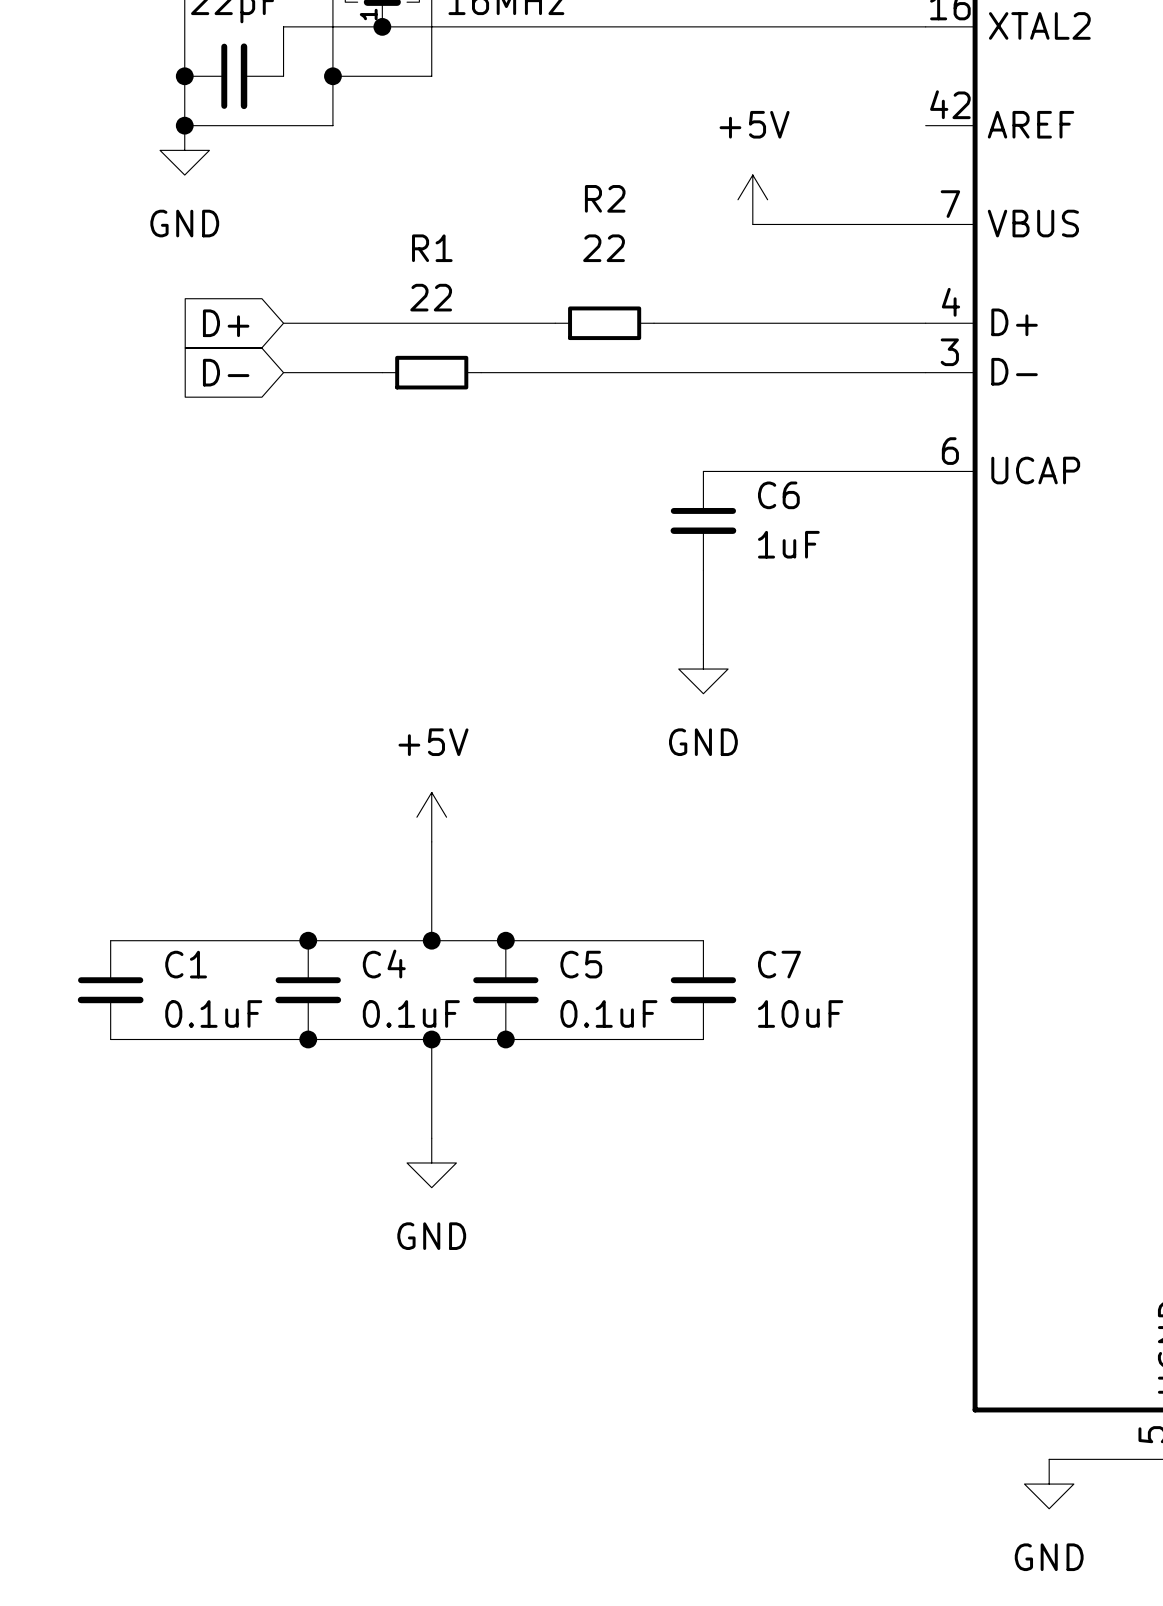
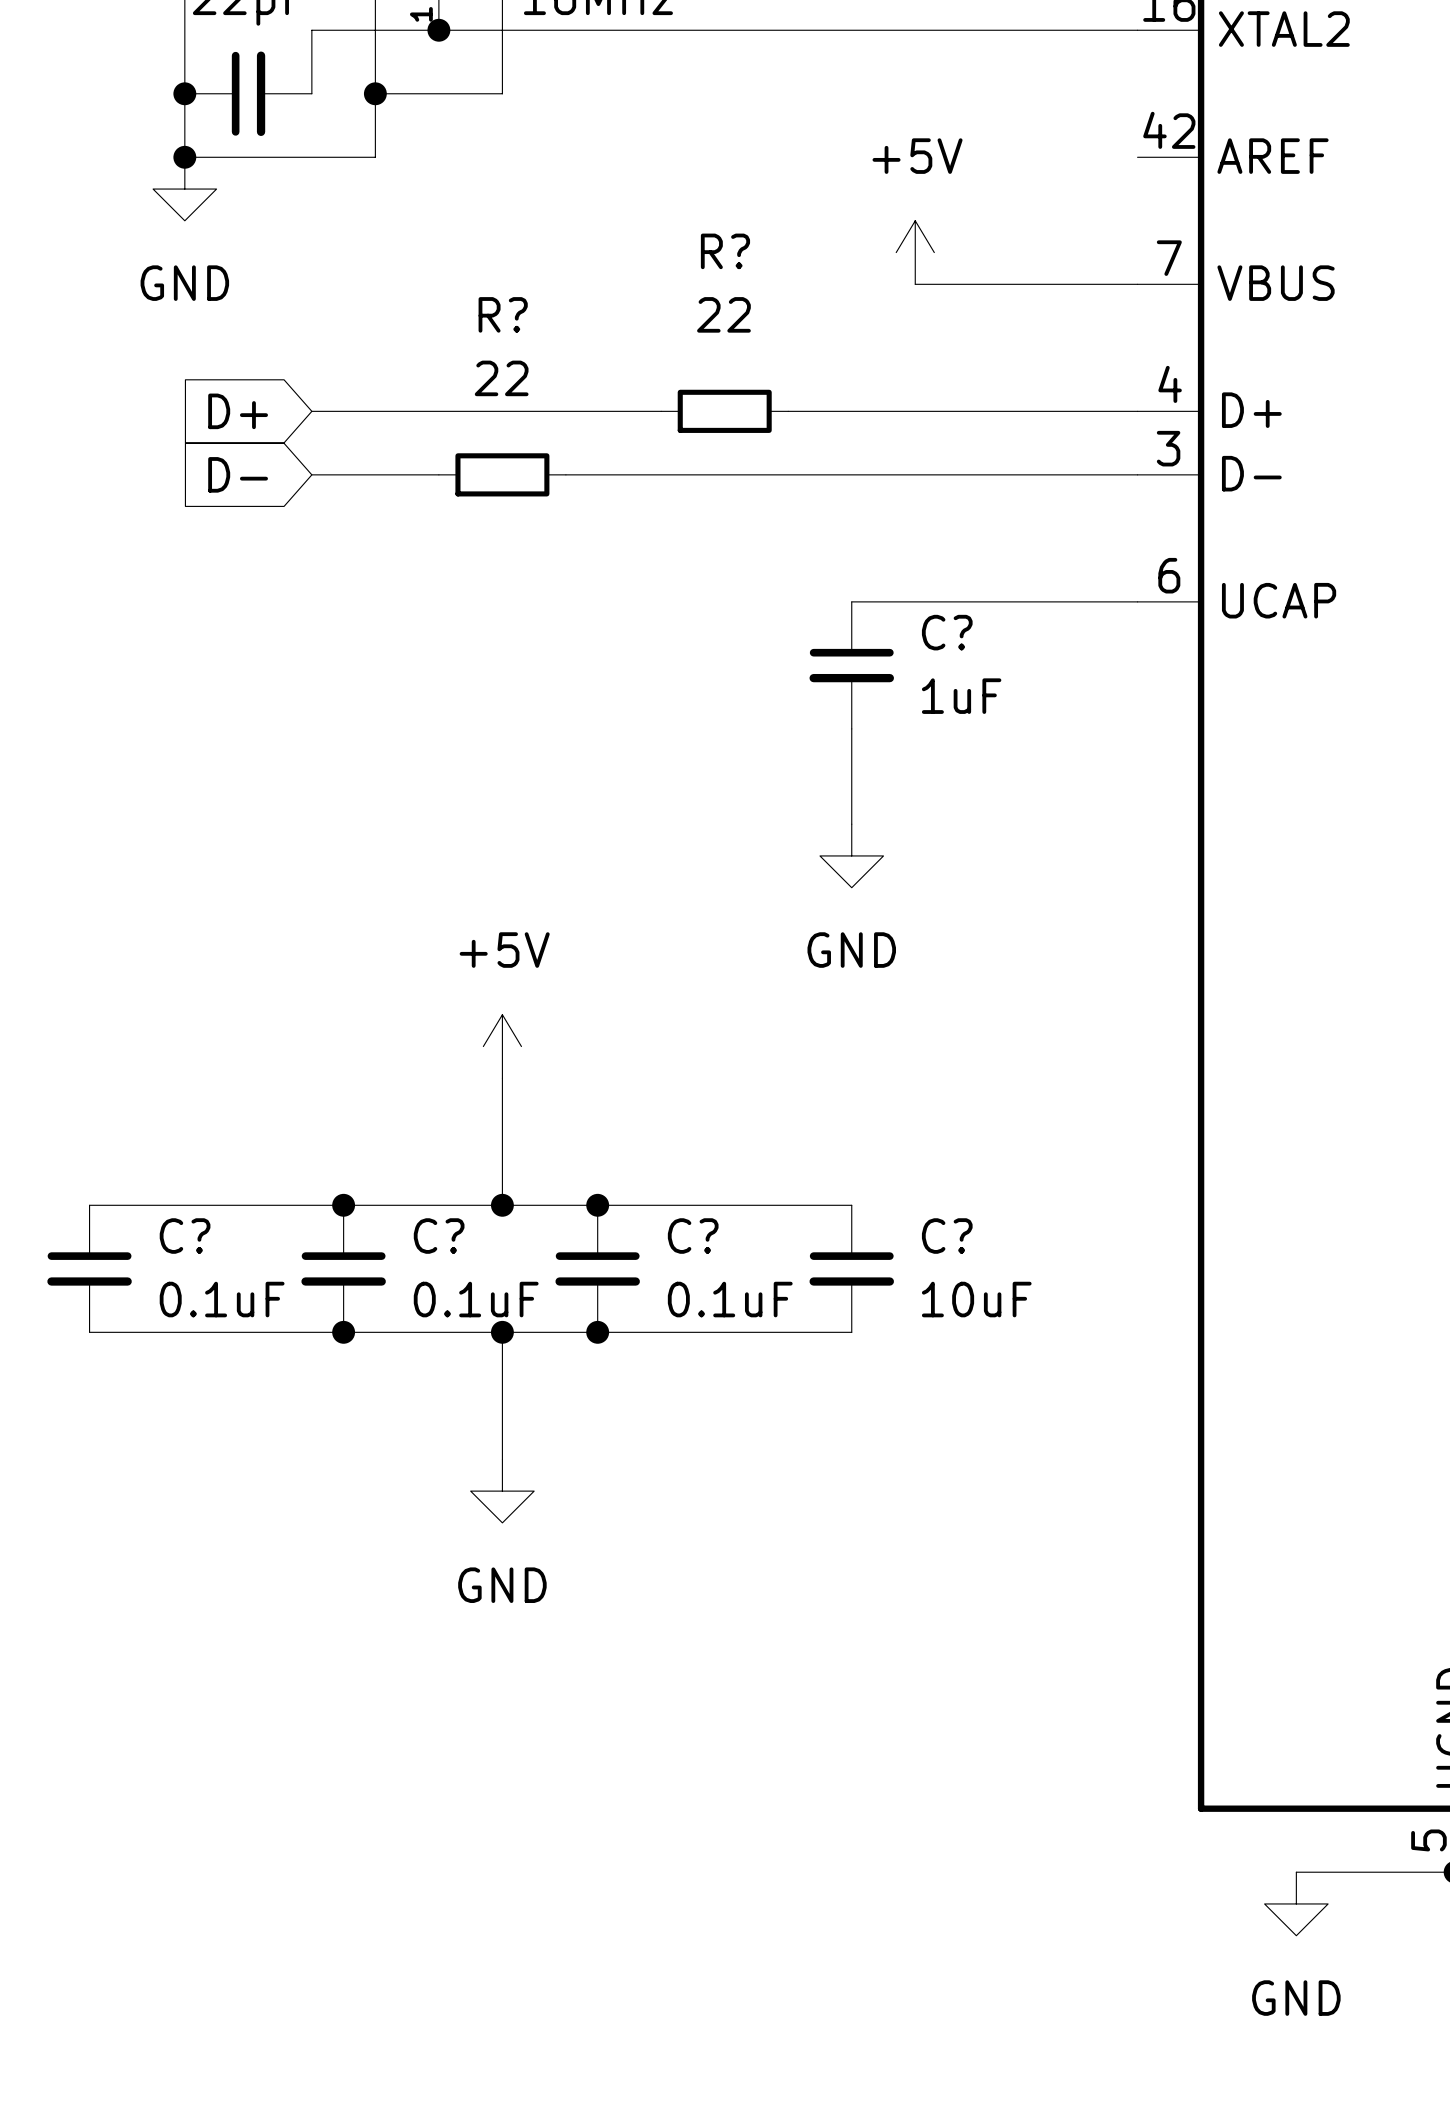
R2 name: R2 (605, 198) -> R? (725, 251)
R1 name: R1 (432, 248) -> R? (503, 314)
C6 name: C6 (778, 495) -> C? (947, 632)
C1 name: C1 (186, 964) -> C? (185, 1236)
C4 name: C4 (384, 964) -> C? (439, 1236)
C5 name: C5 (581, 964) -> C? (693, 1236)
C7 name: C7 (779, 964) -> C? (947, 1236)

